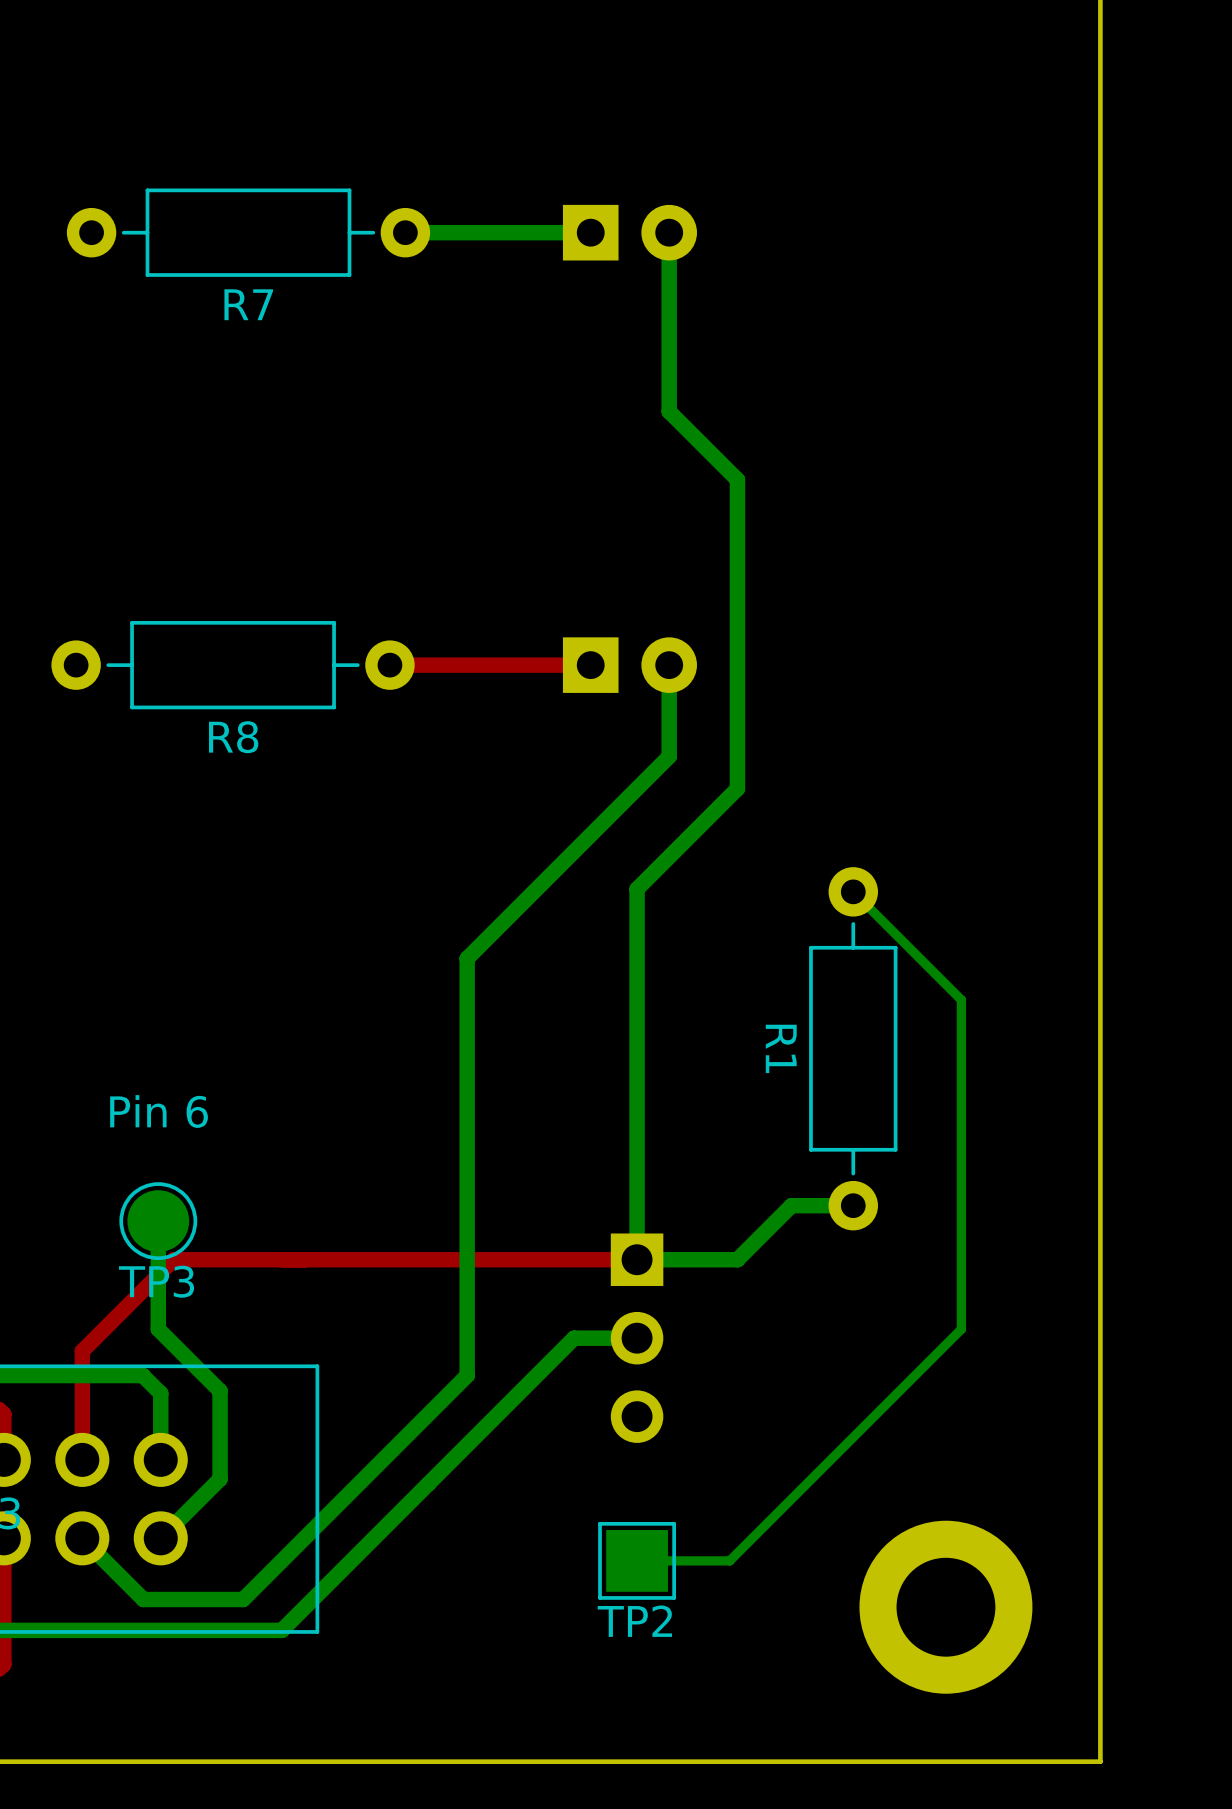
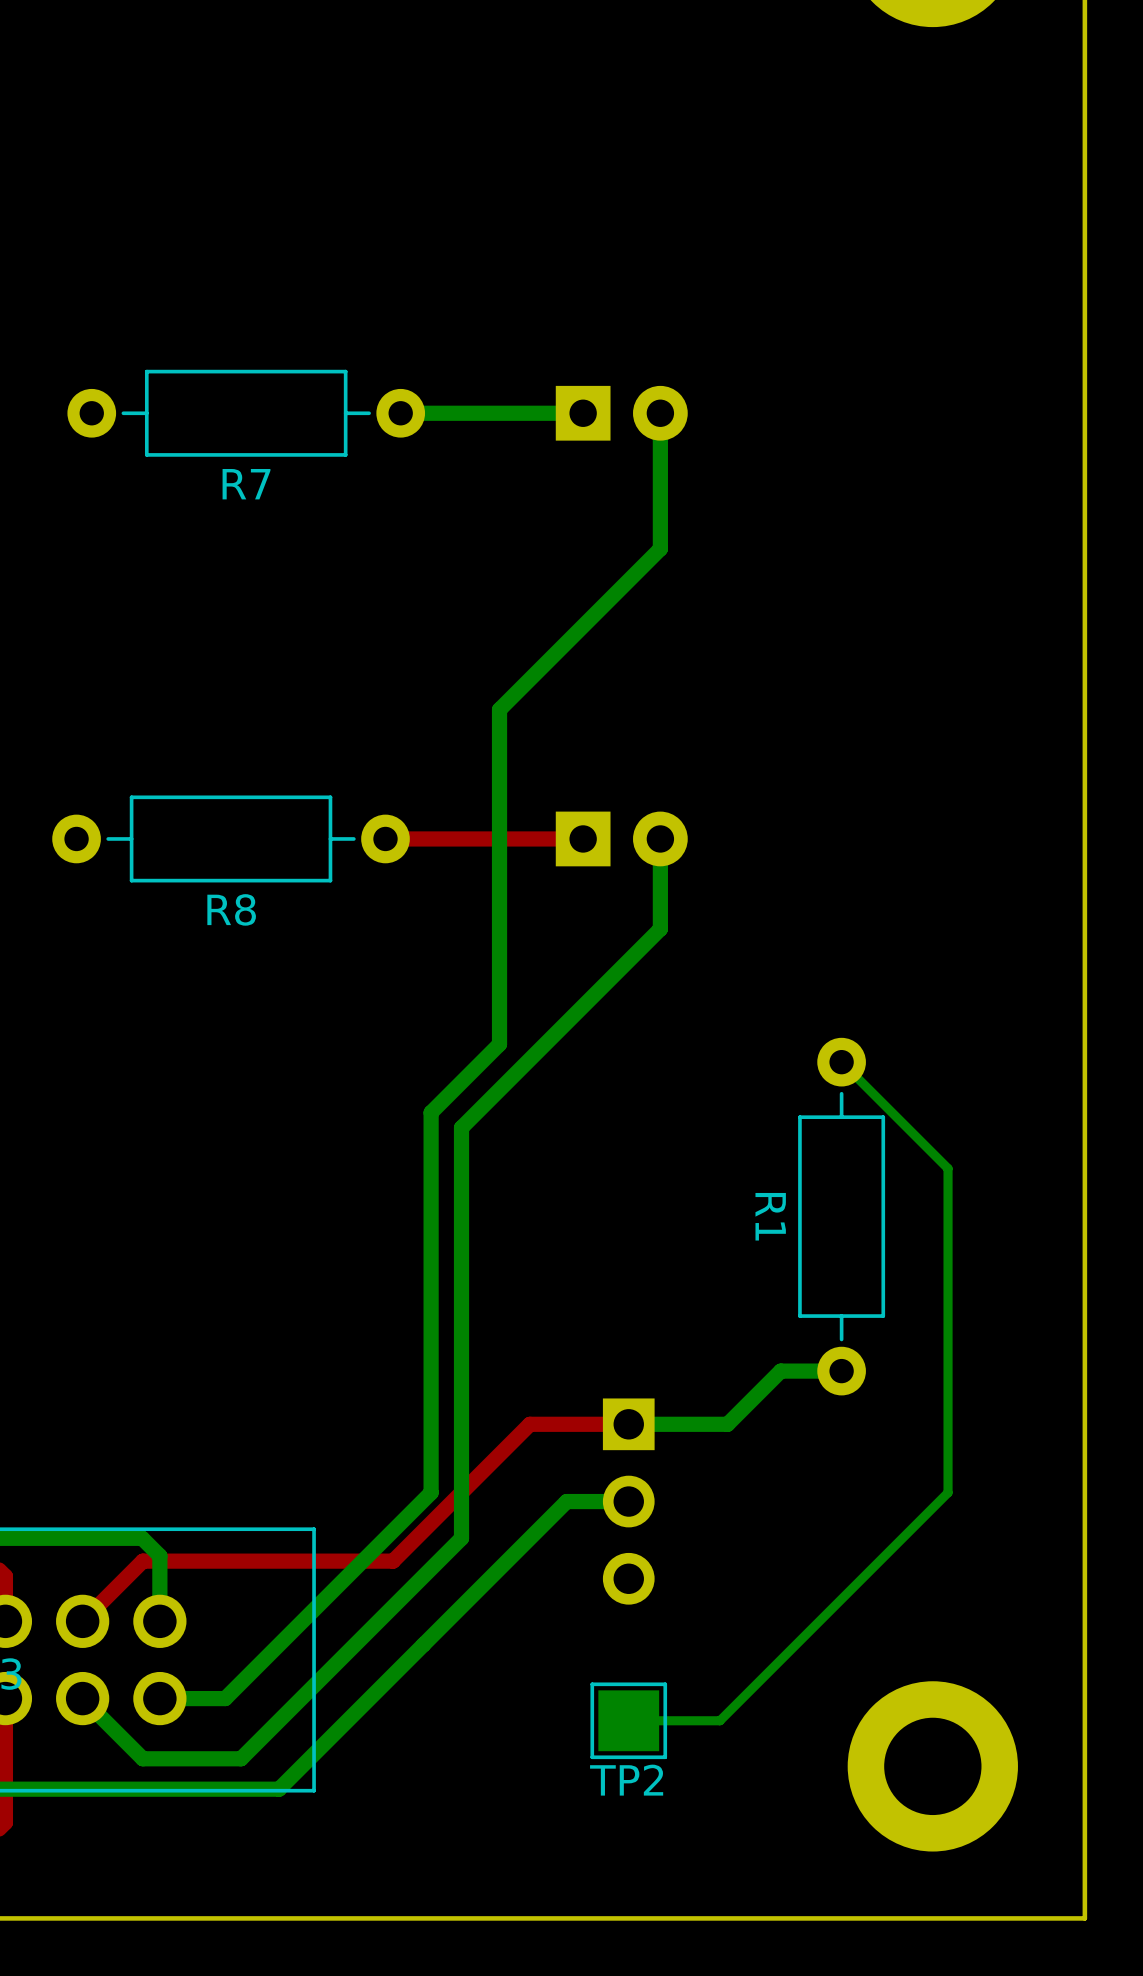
bottom track: (669, 370) (669, 411) (737, 479) (737, 788) (637, 889) (637, 1259) -> (660, 548) (499, 709) (499, 1044) (431, 1112) (431, 1492) (225, 1698) (159, 1698)
text: Pin 6 (159, 1111) -> none
bottom track: (158, 1221) (158, 1329) (220, 1391) (220, 1479) (160, 1538) -> none
TP3: (158, 1221) -> none
top track: (536, 1259) (173, 1259) (82, 1351) (82, 1459) -> (529, 1424) (393, 1561) (142, 1561) (82, 1621)

